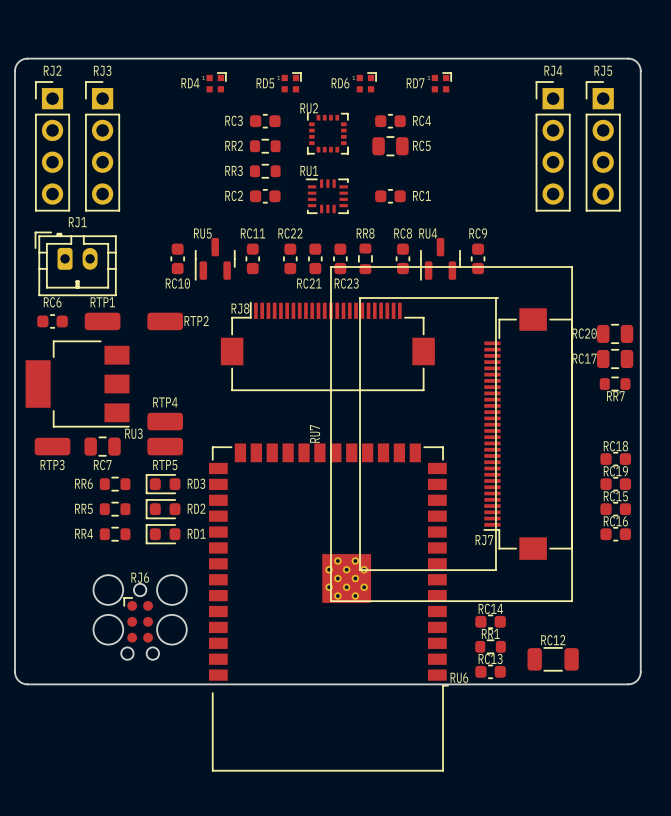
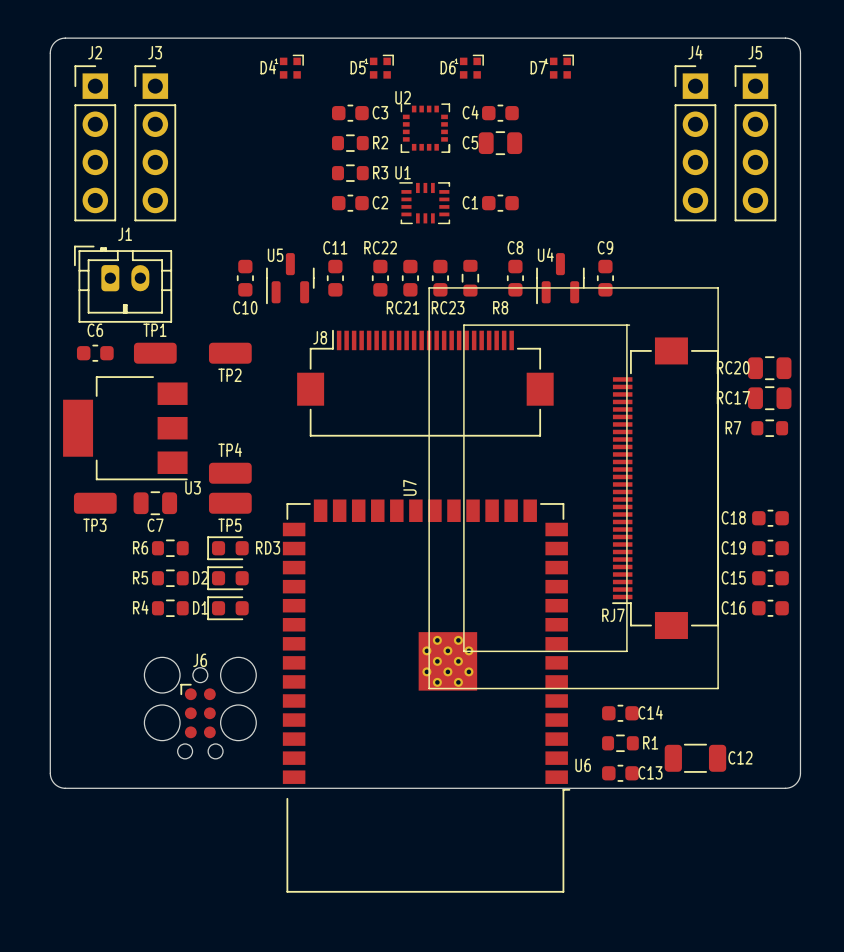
RJ2 name: RJ2 (52, 70) -> J2 (95, 52)
RJ3 name: RJ3 (102, 70) -> J3 (155, 52)
RJ4 name: RJ4 (553, 70) -> J4 (695, 52)
RJ5 name: RJ5 (603, 70) -> J5 (755, 52)
RD4 name: RD4 (190, 83) -> D4 (268, 67)
RD5 name: RD5 (265, 83) -> D5 (358, 67)
RD6 name: RD6 (340, 83) -> D6 (448, 67)
RD7 name: RD7 (415, 83) -> D7 (538, 67)
RU2 name: RU2 (309, 108) -> U2 (403, 97)
RC3 name: RC3 (234, 120) -> C3 (380, 112)
RC4 name: RC4 (422, 120) -> C4 (470, 112)
RR2 name: RR2 (234, 145) -> R2 (380, 142)
RC5 name: RC5 (421, 145) -> C5 (470, 142)
RR3 name: RR3 (234, 170) -> R3 (380, 172)
RU1 name: RU1 (309, 170) -> U1 (403, 172)
RC2 name: RC2 (234, 195) -> C2 (380, 202)
RC1 name: RC1 (421, 195) -> C1 (470, 202)
RJ1 name: RJ1 (77, 222) -> J1 (125, 234)
RU5 name: RU5 (202, 233) -> U5 (275, 255)
RC11 name: RC11 (253, 233) -> C11 (335, 247)
RR8 name: RR8 (365, 233) -> R8 (500, 307)
RC8 name: RC8 (403, 233) -> C8 (515, 247)
RU4 name: RU4 (428, 233) -> U4 (545, 254)
RC9 name: RC9 (478, 233) -> C9 (605, 247)
RC10 name: RC10 (177, 283) -> C10 (245, 307)
RC6 name: RC6 (52, 302) -> C6 (95, 330)
RTP1 name: RTP1 (102, 302) -> TP1 (154, 330)
RJ8 name: RJ8 (240, 308) -> J8 (320, 337)
RTP2 name: RTP2 (196, 320) -> TP2 (229, 375)
RR7 name: RR7 (615, 396) -> R7 (733, 427)
RTP4 name: RTP4 (165, 402) -> TP4 (230, 449)
RU3 name: RU3 (133, 433) -> U3 (193, 487)
RU7 name: RU7 (315, 433) -> U7 (409, 487)
RC18 name: RC18 (615, 446) -> C18 (733, 517)
RTP3 name: RTP3 (52, 464) -> TP3 (94, 525)
RC7 name: RC7 (102, 464) -> C7 (155, 525)
RTP5 name: RTP5 (165, 465) -> TP5 (229, 525)
RC19 name: RC19 (615, 471) -> C19 (733, 547)
RR6 name: RR6 (83, 483) -> R6 (140, 547)
RC15 name: RC15 (615, 496) -> C15 (733, 577)
RR5 name: RR5 (83, 508) -> R5 (140, 577)
RD2 name: RD2 (196, 508) -> D2 (200, 577)
RC16 name: RC16 (615, 521) -> C16 (733, 607)
RR4 name: RR4 (84, 533) -> R4 (140, 607)
RD1 name: RD1 (196, 533) -> D1 (200, 607)
RJ6 name: RJ6 (140, 577) -> J6 (200, 660)
RC14 name: RC14 (490, 608) -> C14 (650, 712)
RR1 name: RR1 (490, 633) -> R1 (650, 742)
RC12 name: RC12 (553, 640) -> C12 (740, 757)
RC13 name: RC13 (490, 658) -> C13 (650, 772)
RU6 name: RU6 (459, 677) -> U6 (583, 765)

